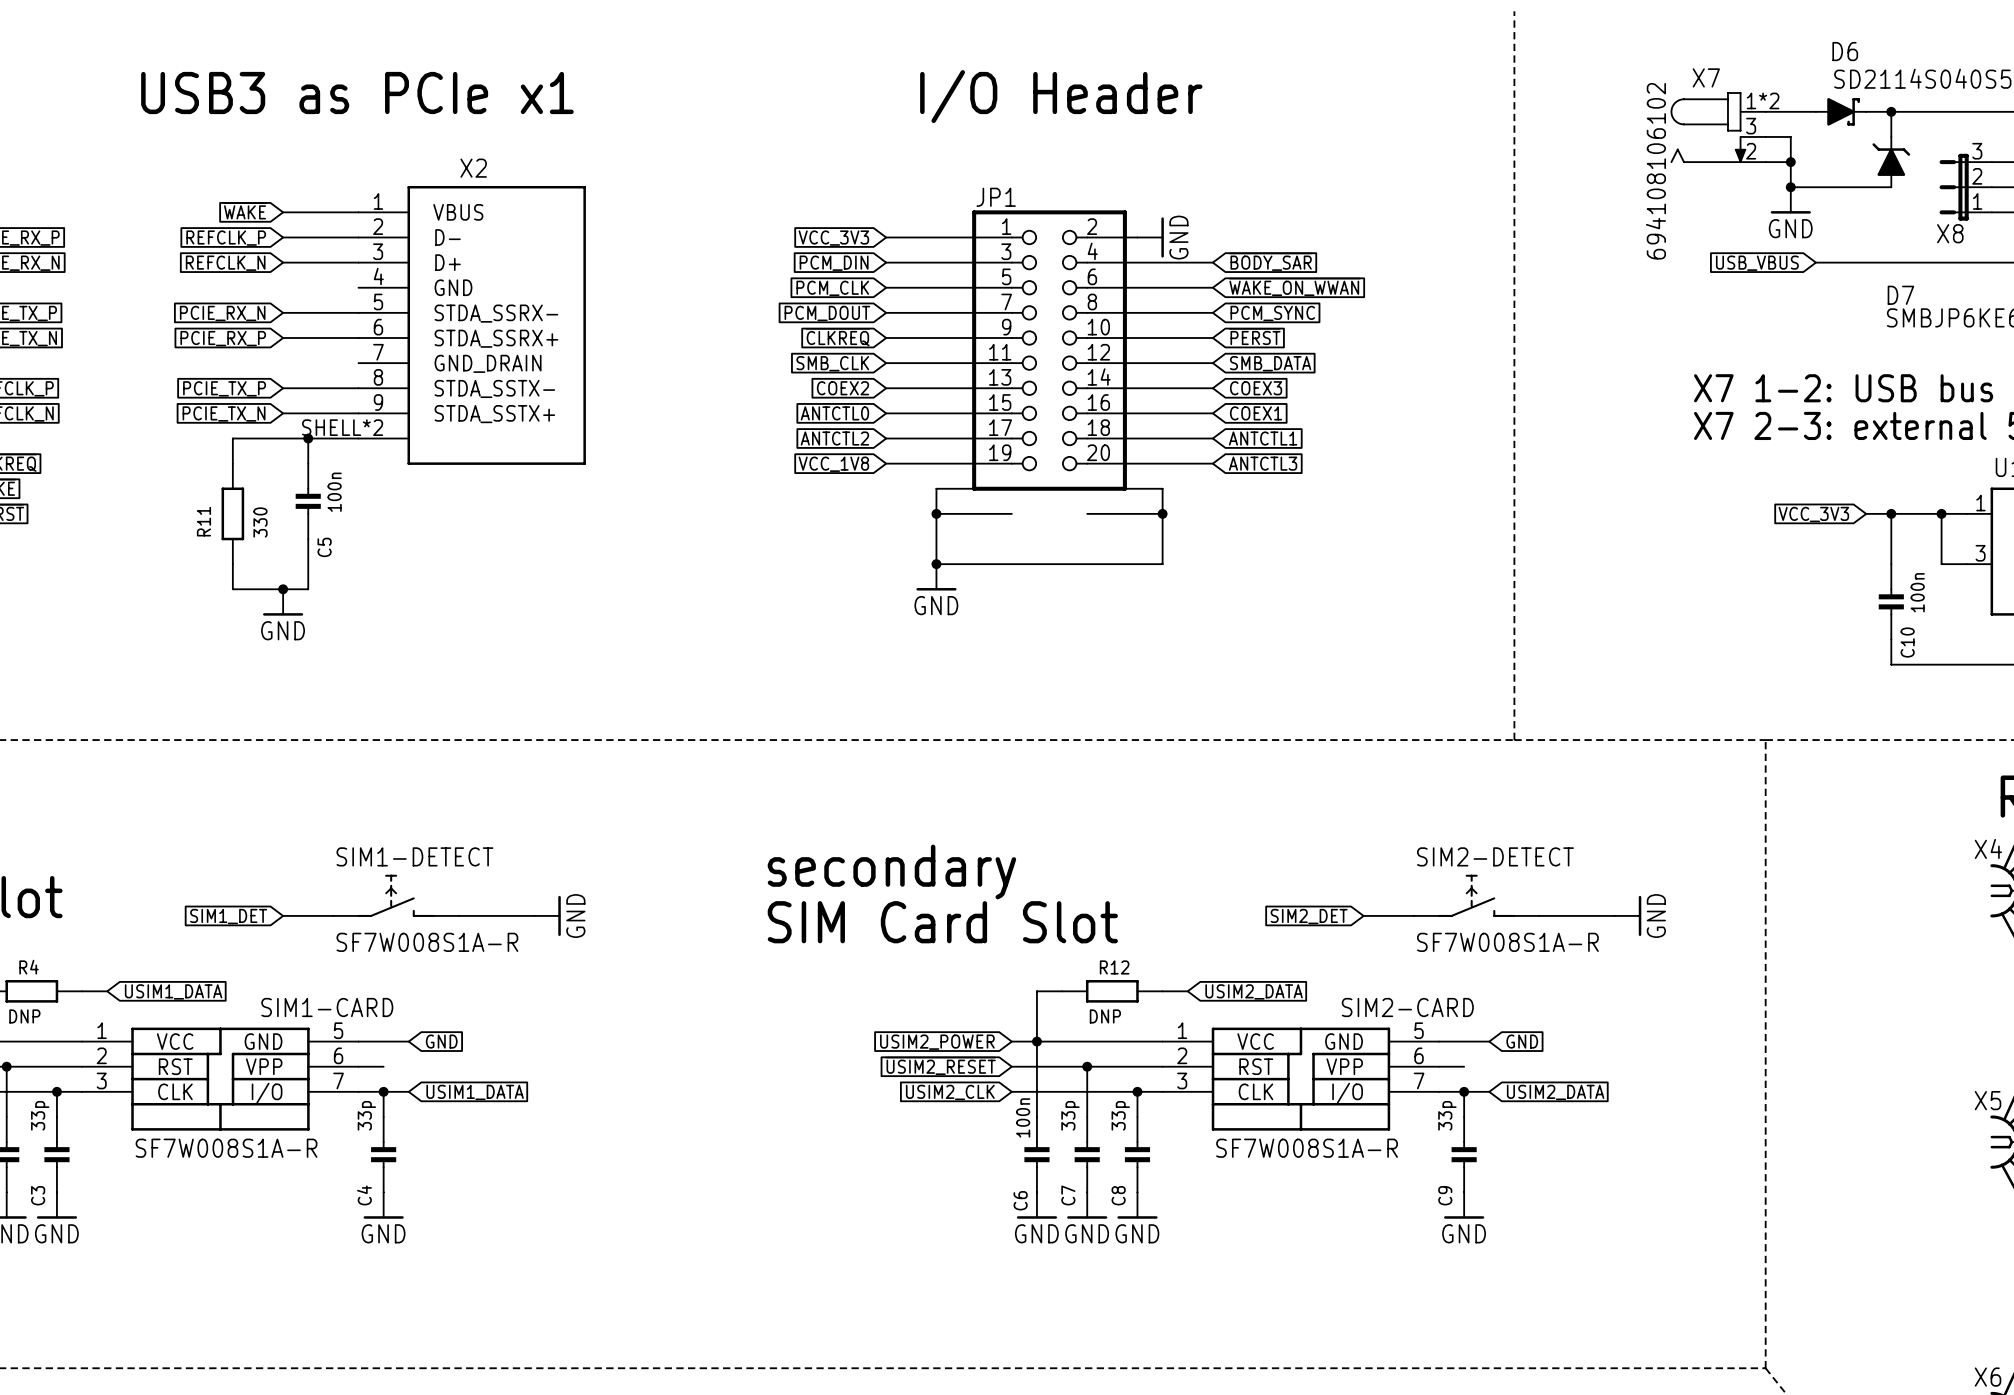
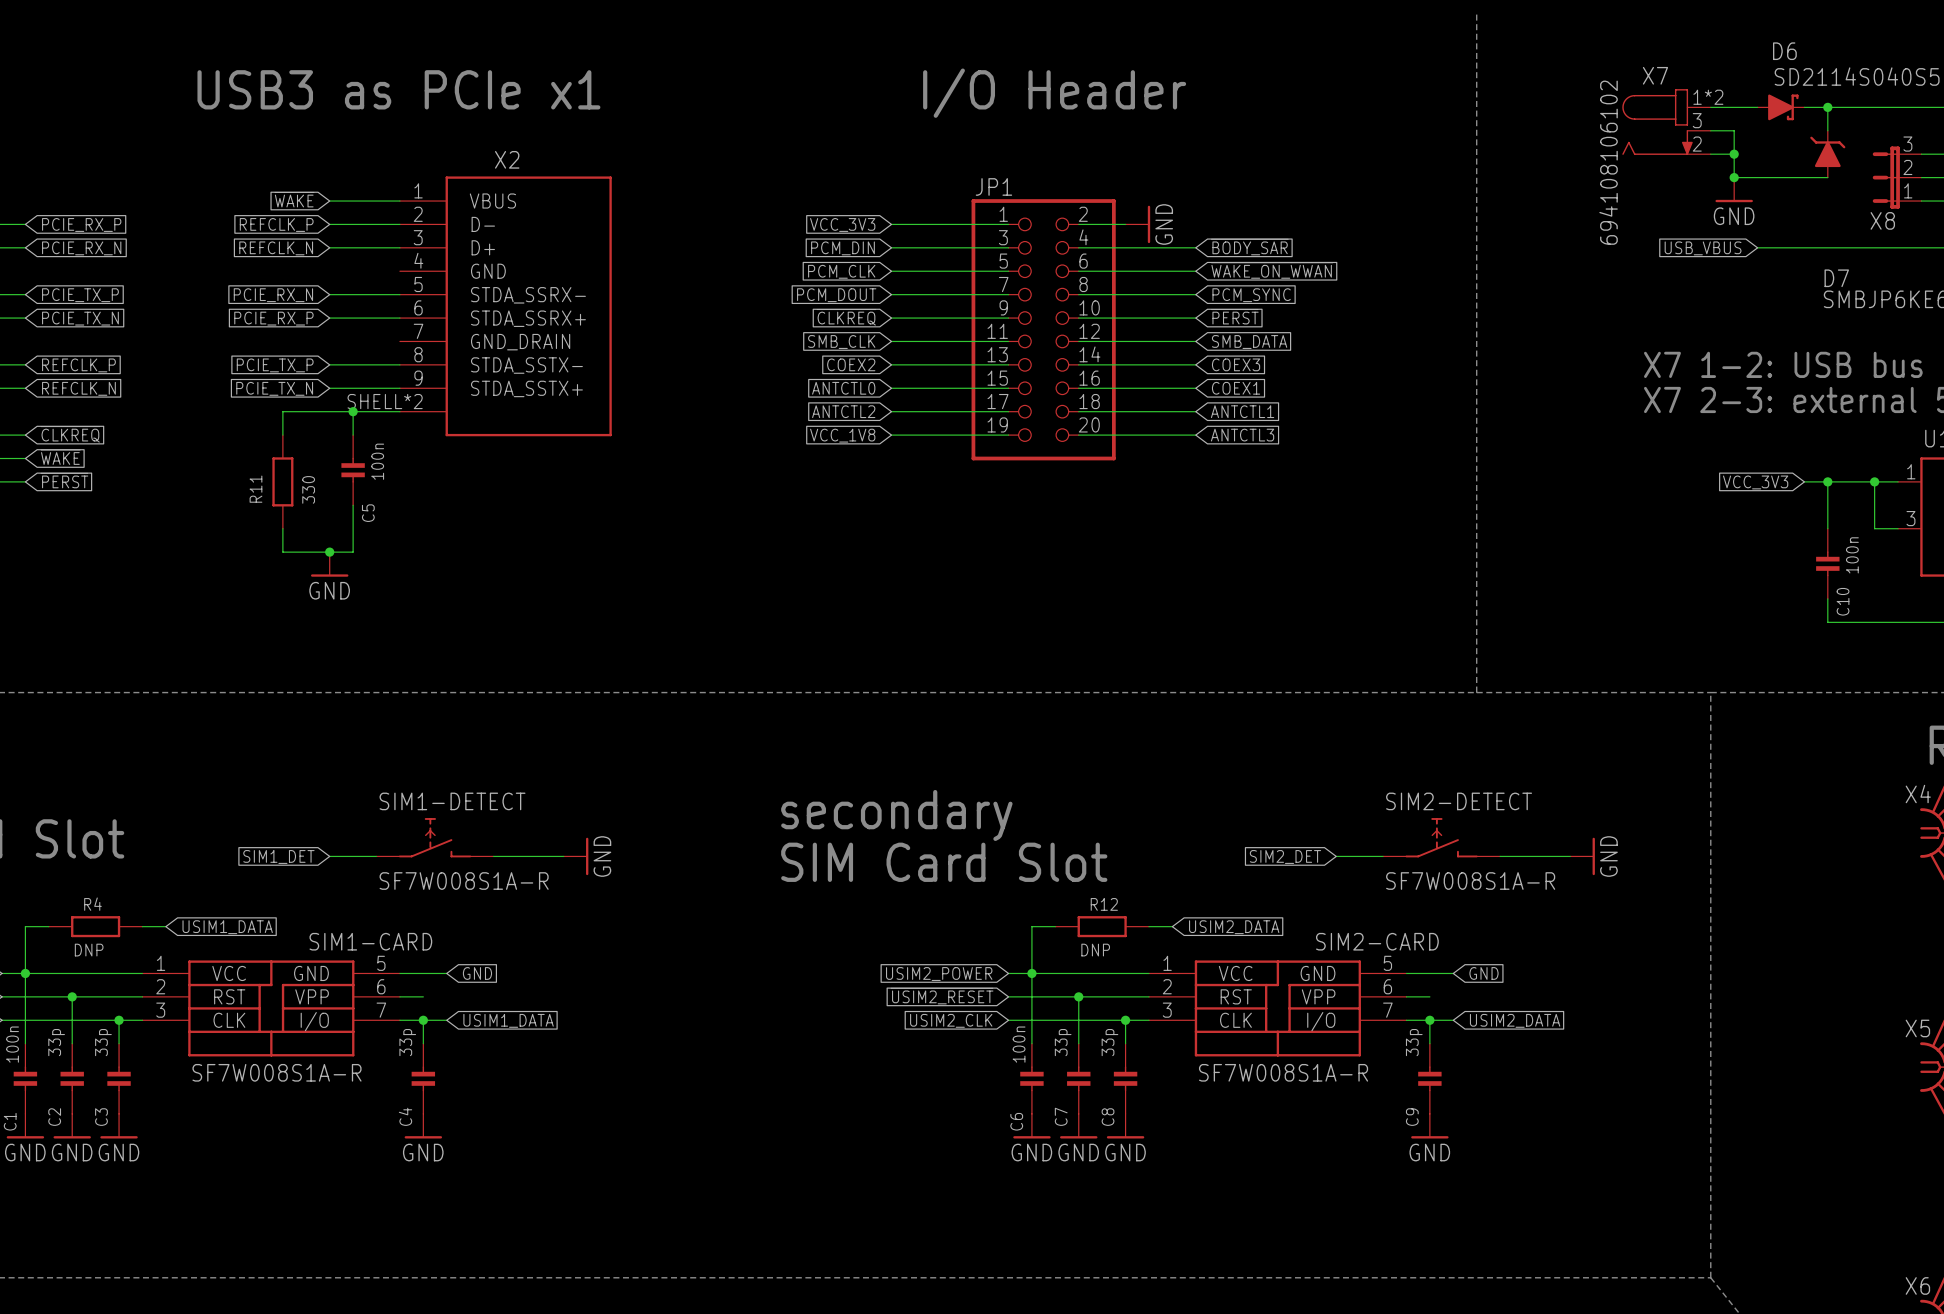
wire: (1011, 488) (936, 488) (936, 564) (1162, 564) (1162, 488) (1087, 488) -> none
wire: (936, 513) (1011, 513) -> none
junction: (936, 513) -> none
wire: (1087, 513) (1162, 513) -> none
junction: (1162, 513) -> none
junction: (936, 564) -> none
power symbol: GND (936, 577) -> none

